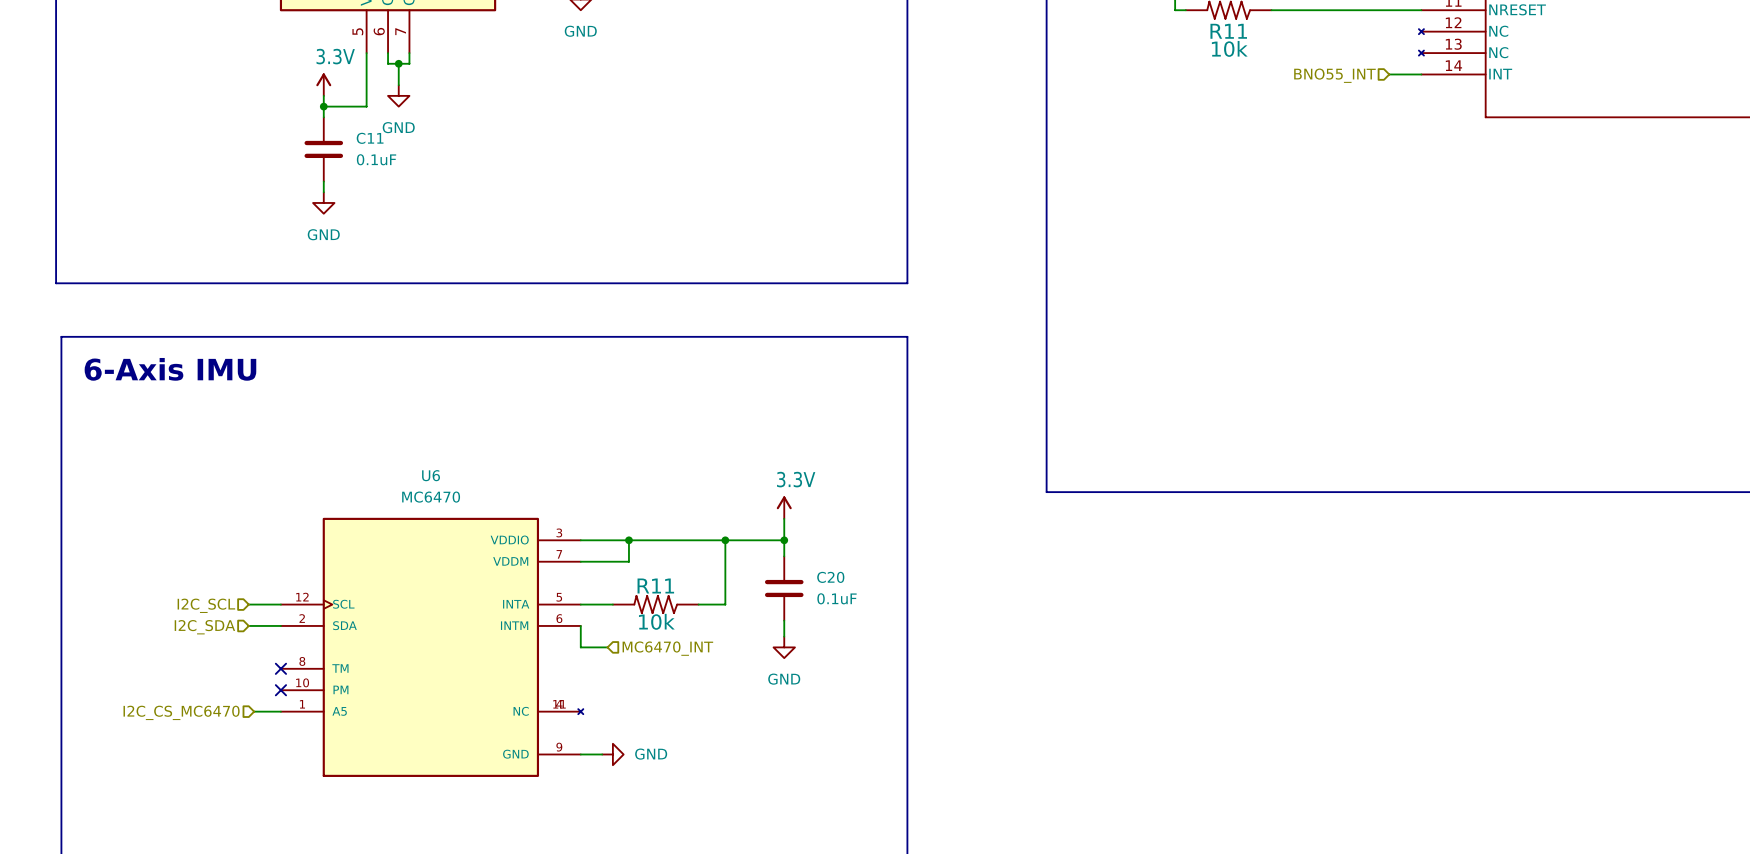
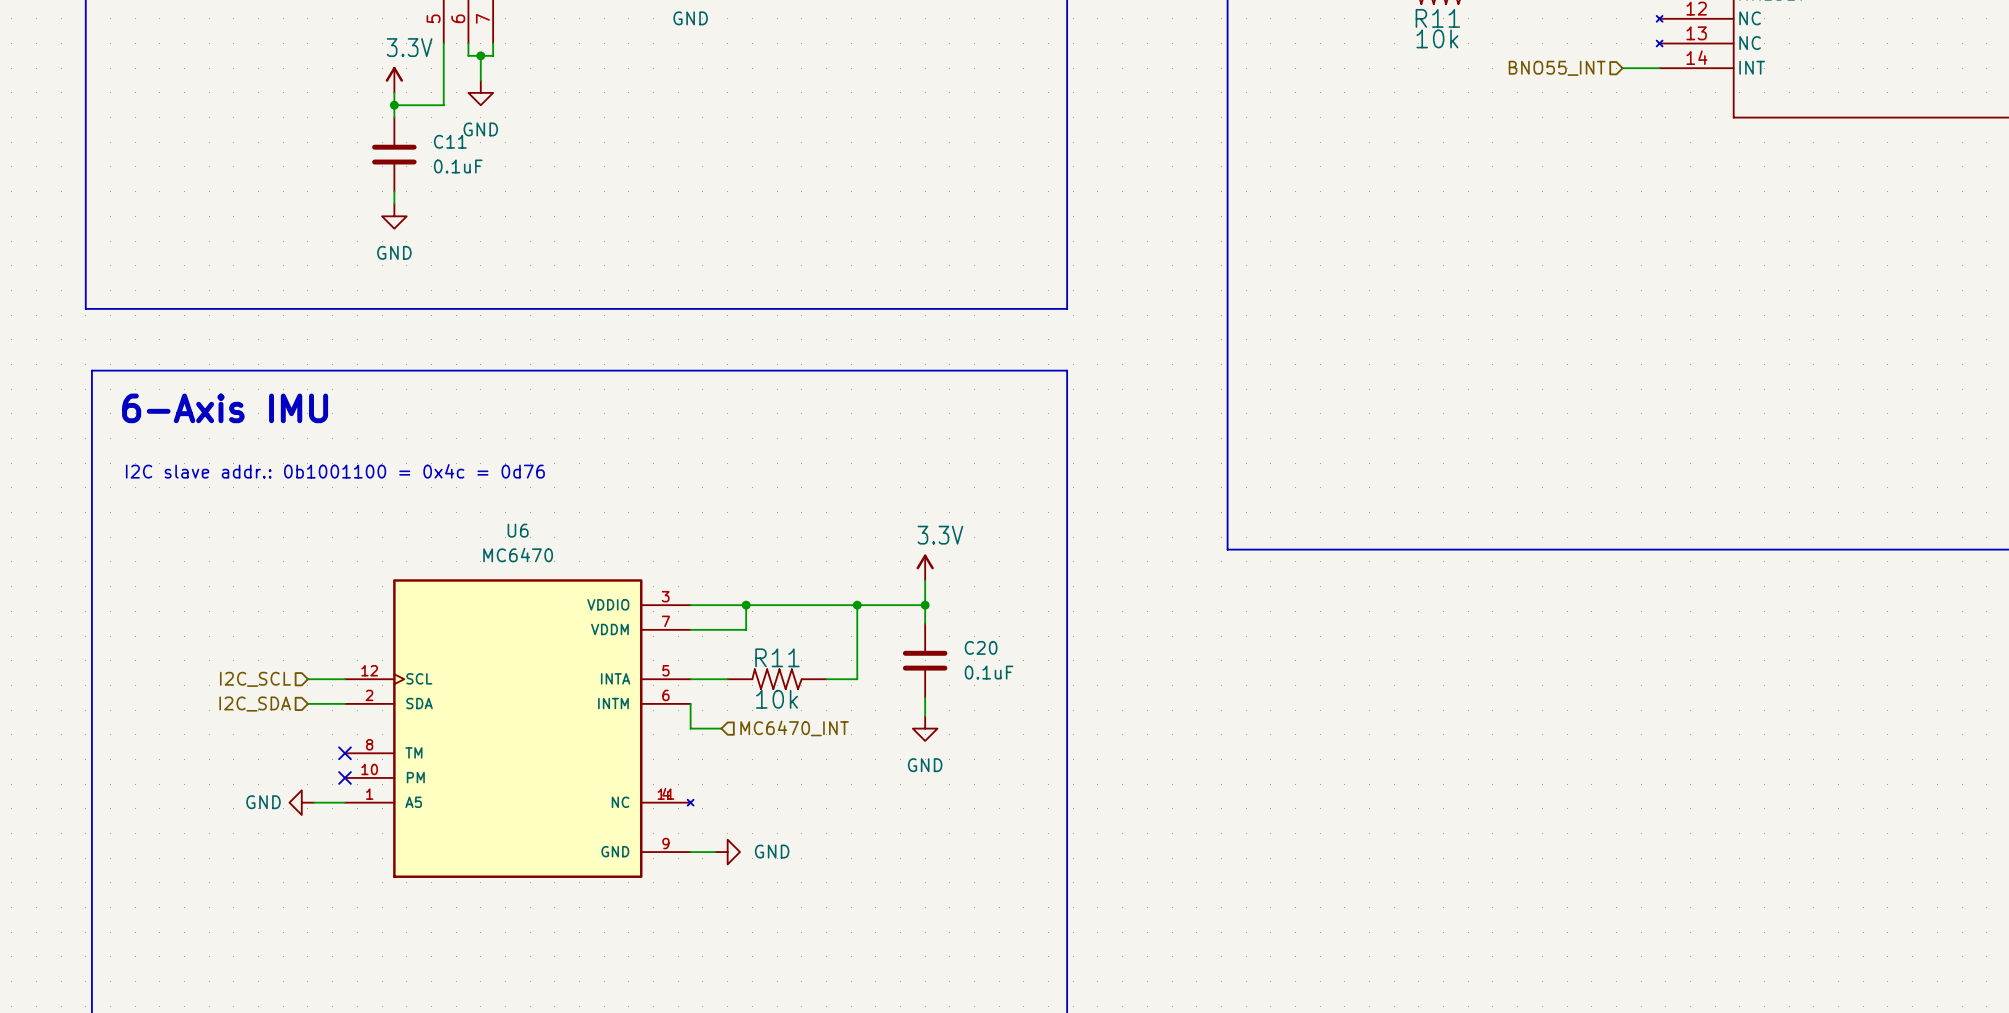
text: none -> I2C slave addr.: 0b1001100 = 0x4c = 0d76 (335, 471)
power symbol: none -> GND (301, 802)
hierarchical label: I2C_CS_MC6470 (181, 712) -> none

